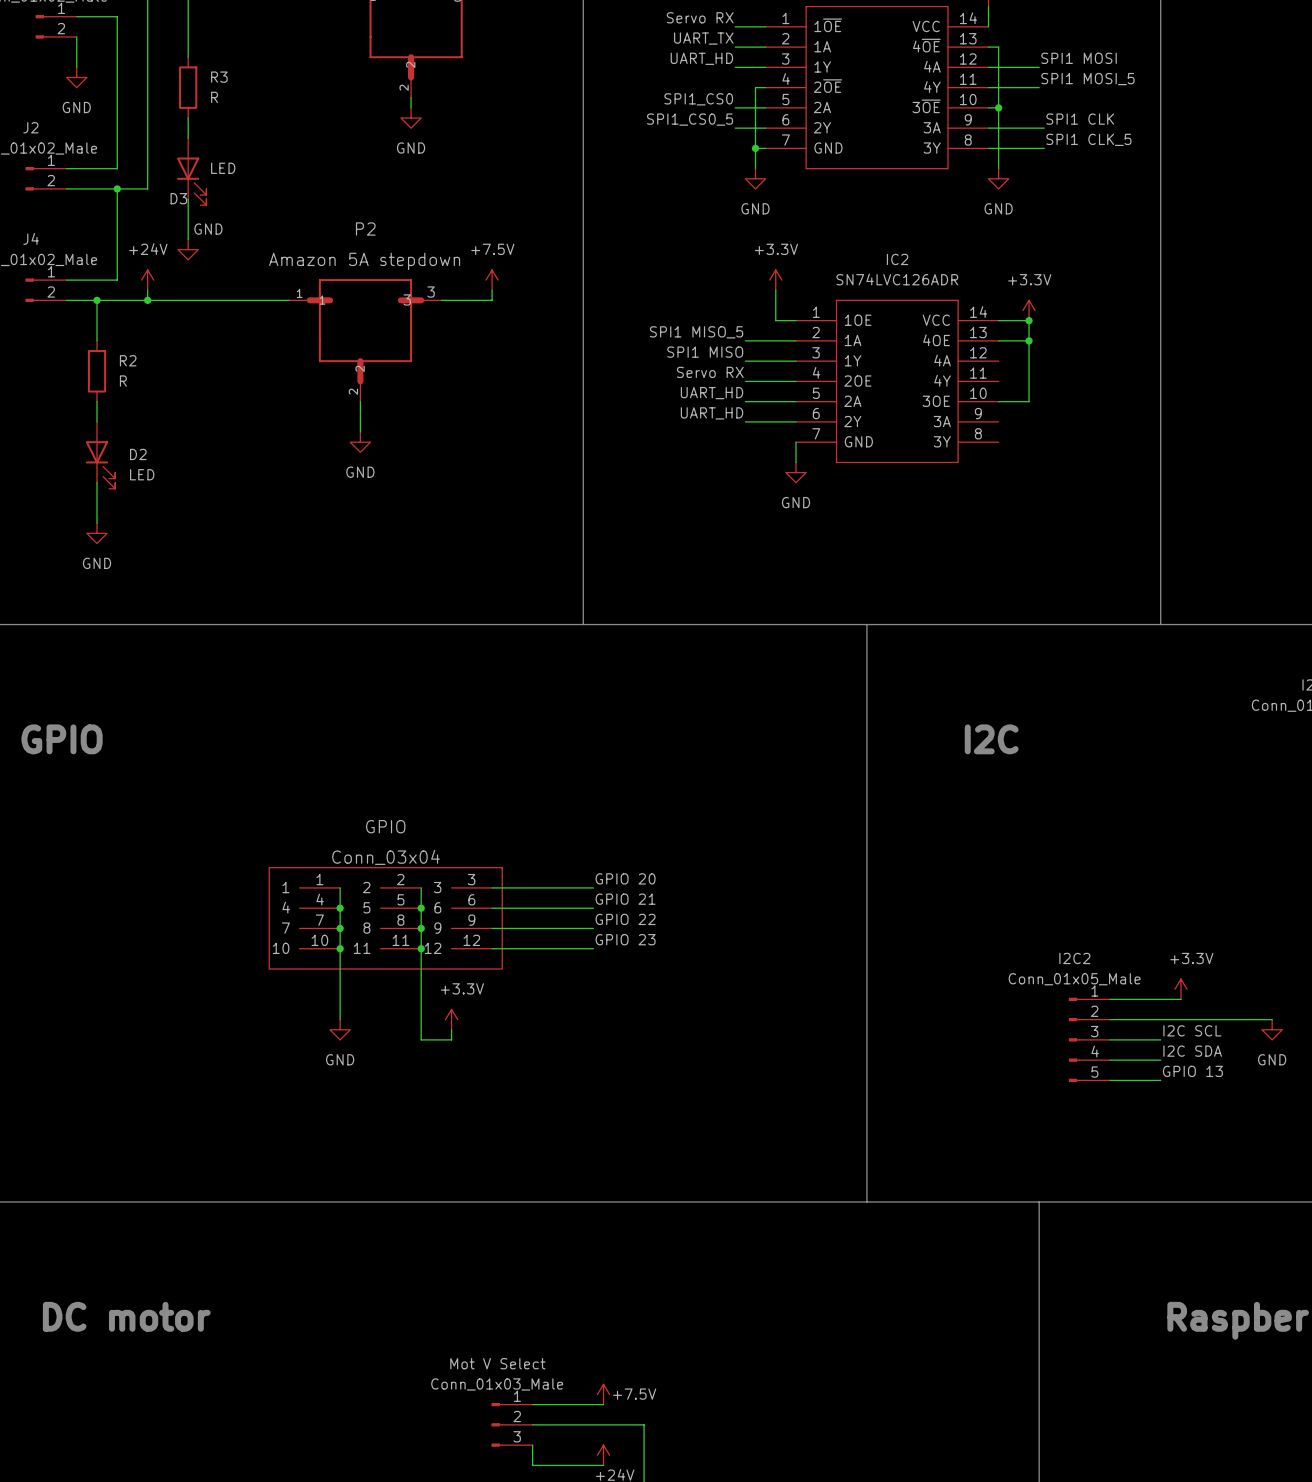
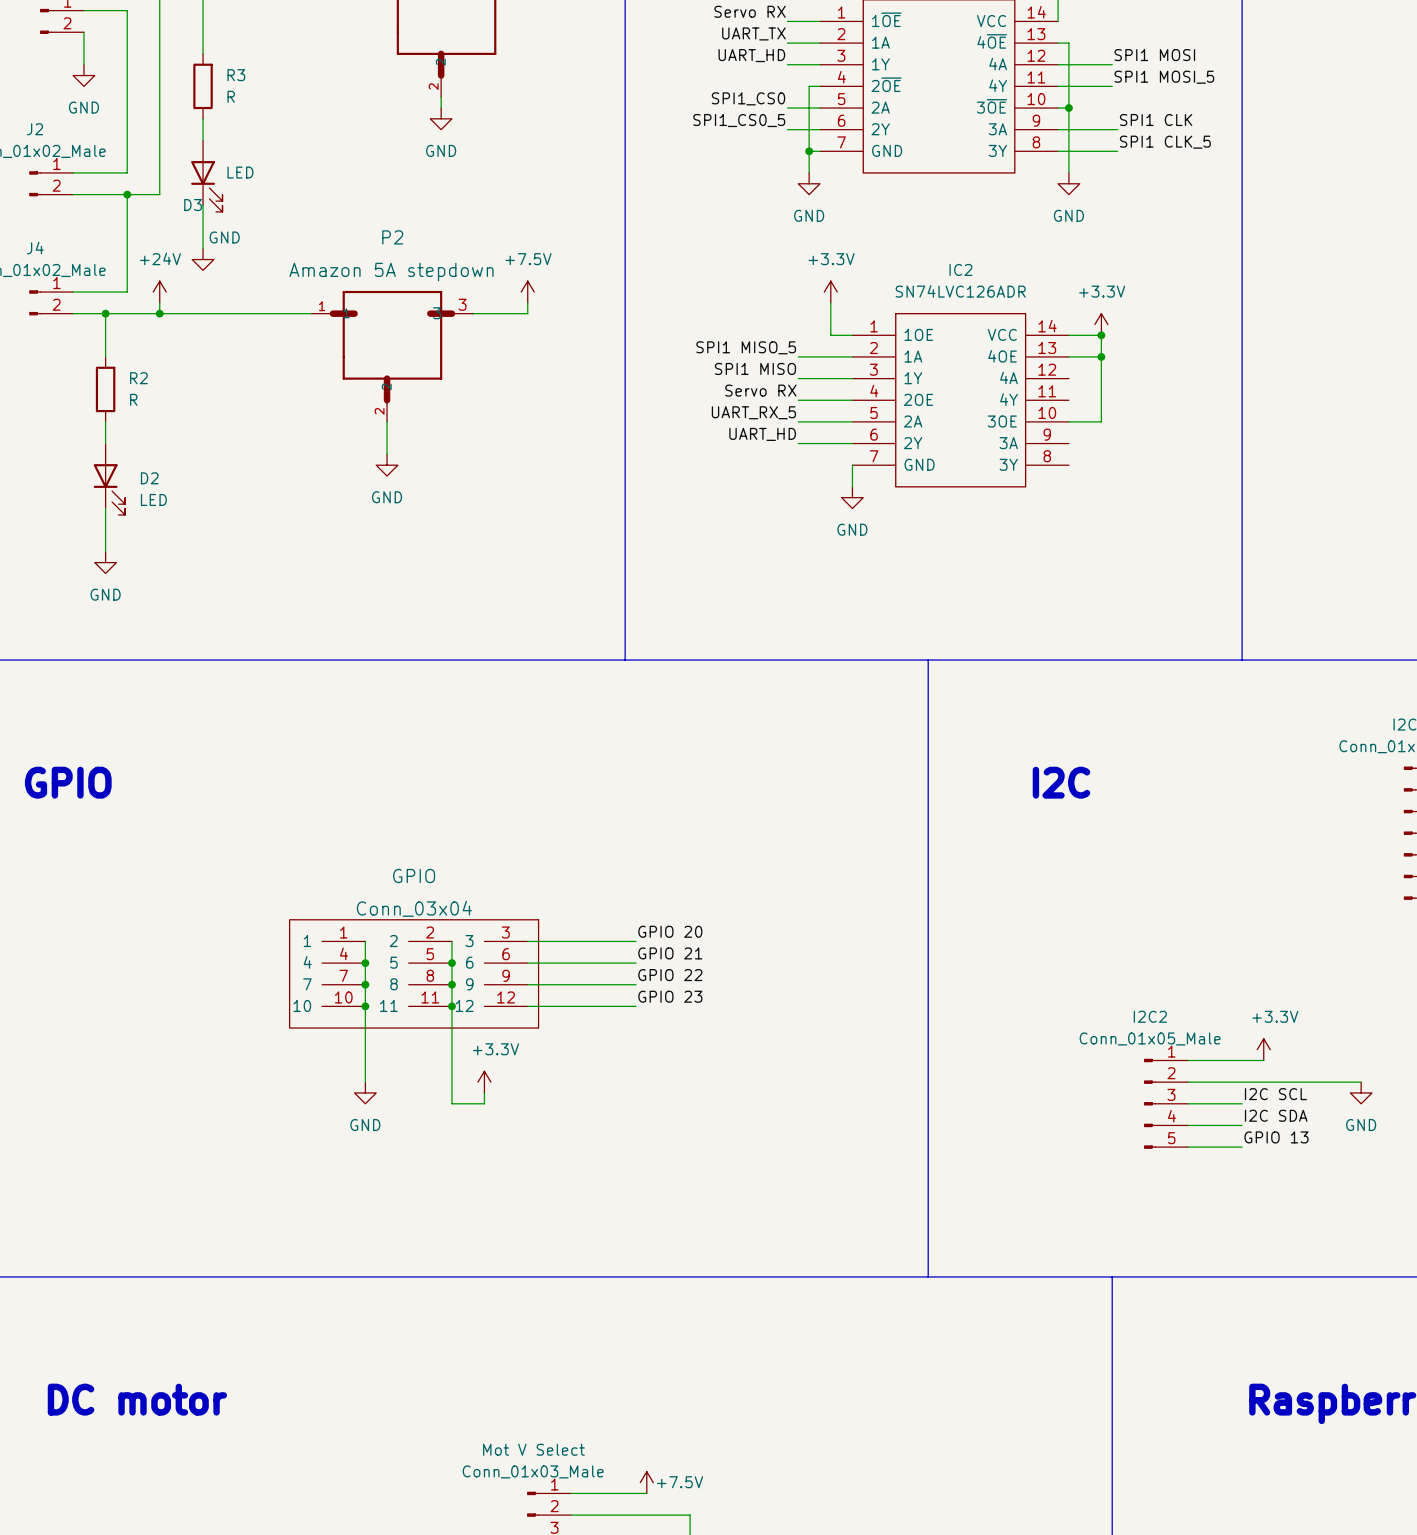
label: UART_HD (712, 393) -> UART_RX_5 (753, 412)

